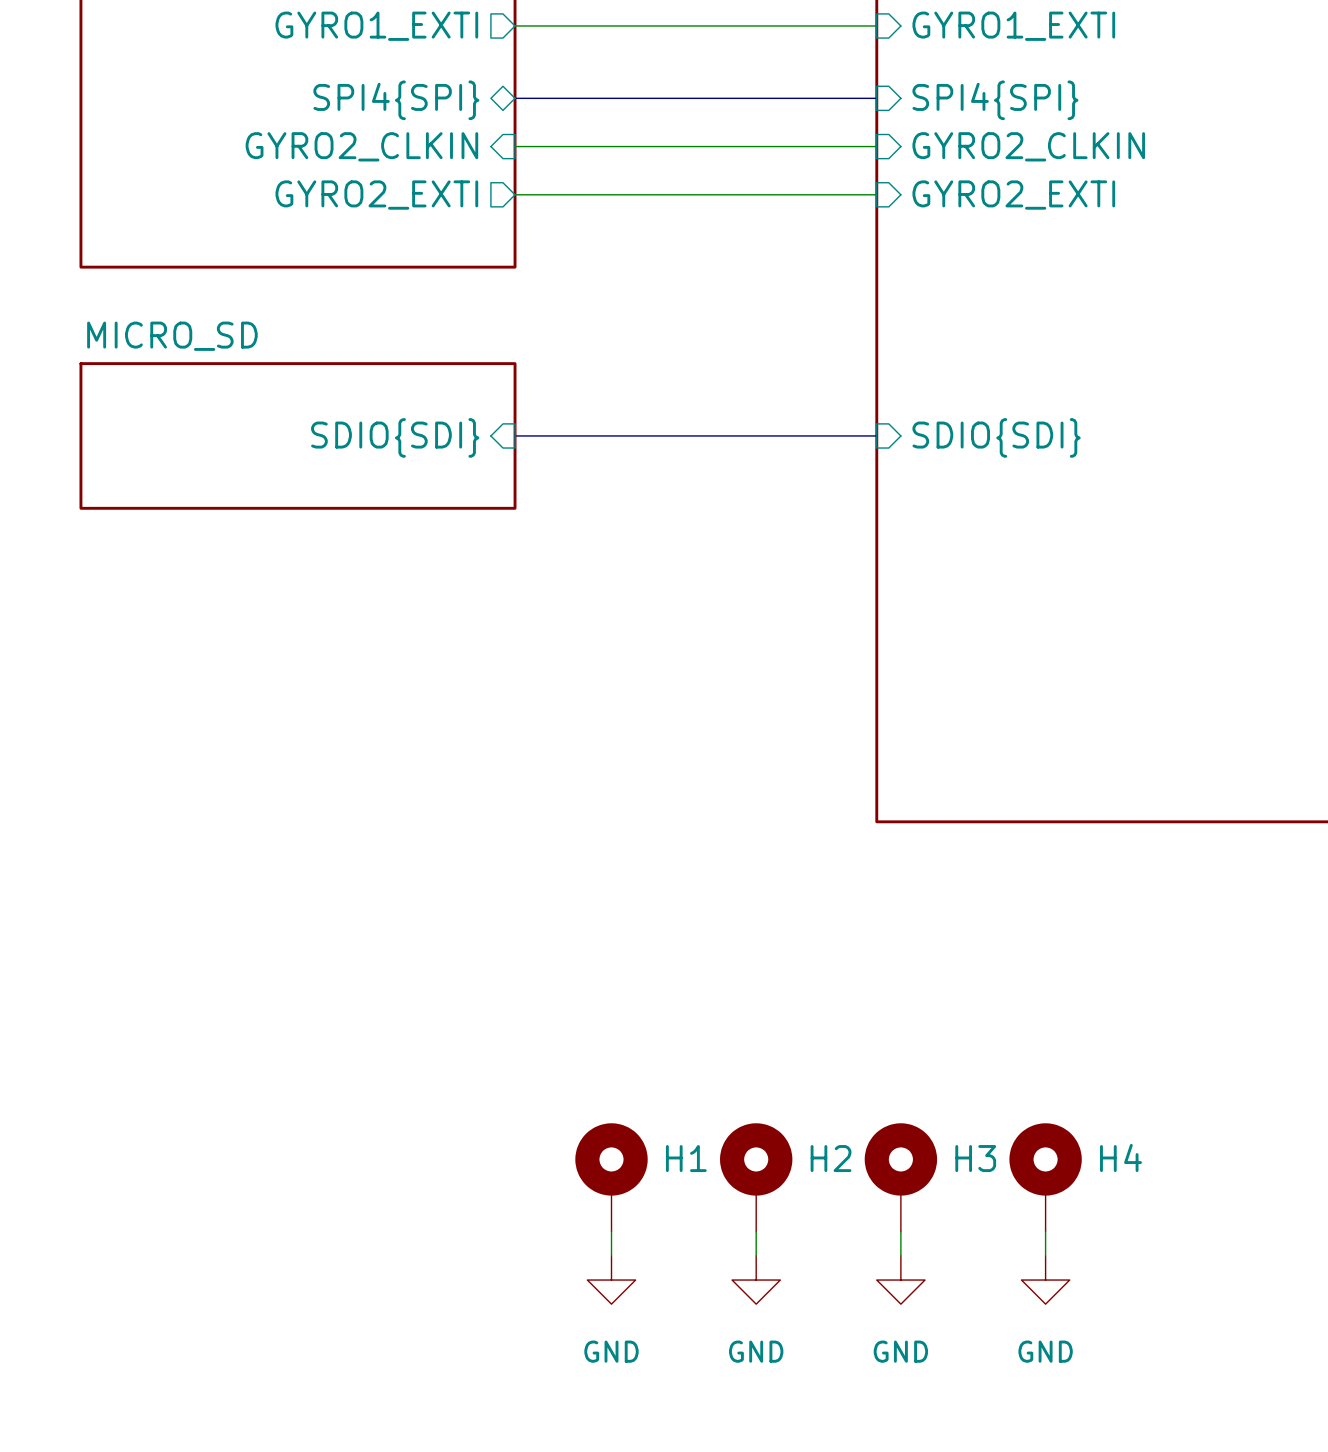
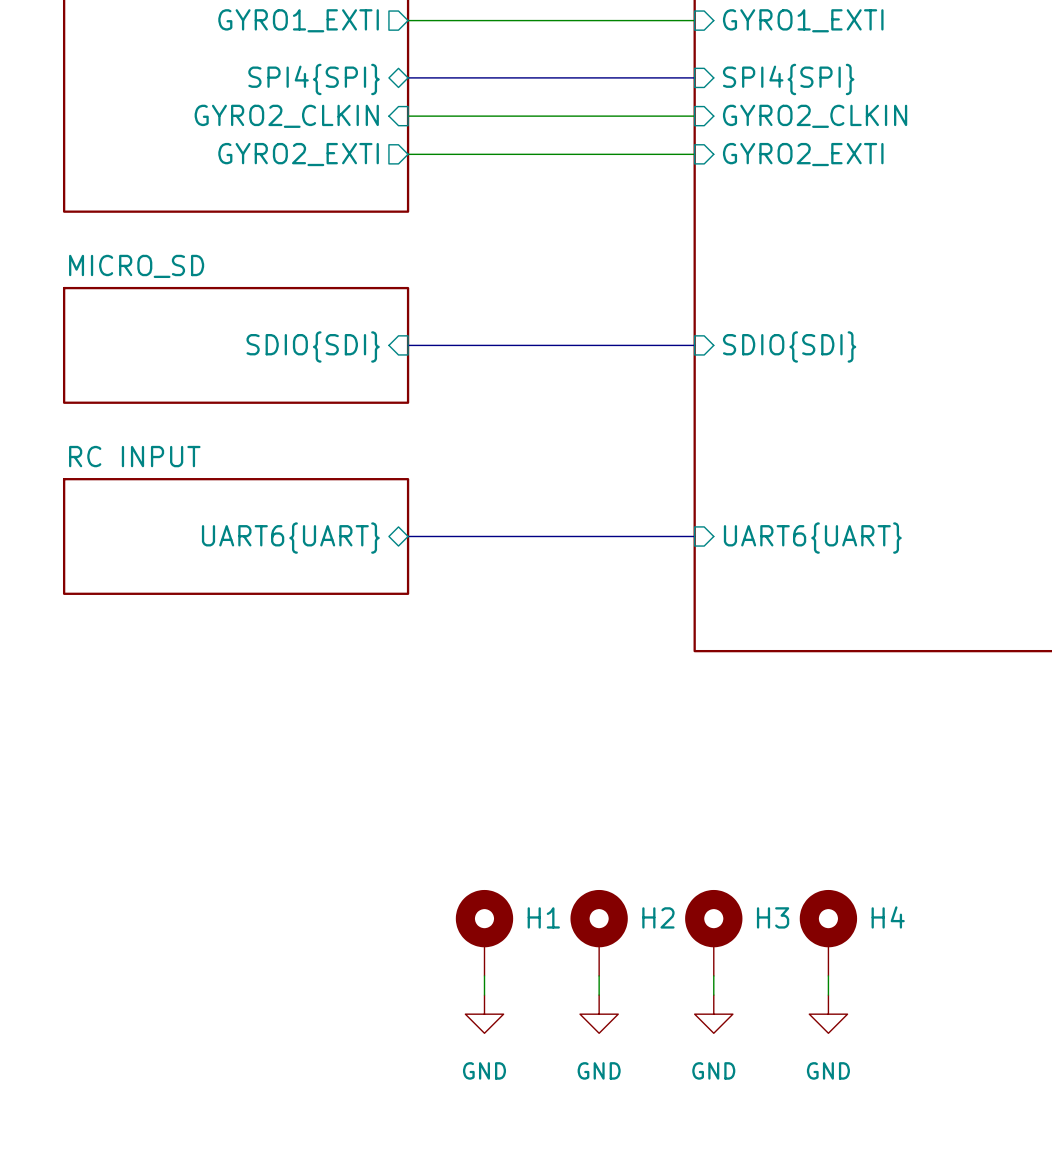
sheet RC INPUT: none -> (236, 536)
bus: none -> (408, 536) (694, 536)
sheet pin: none -> UART6{UART} (290, 538)
sheet pin: none -> UART6{UART} (812, 538)

